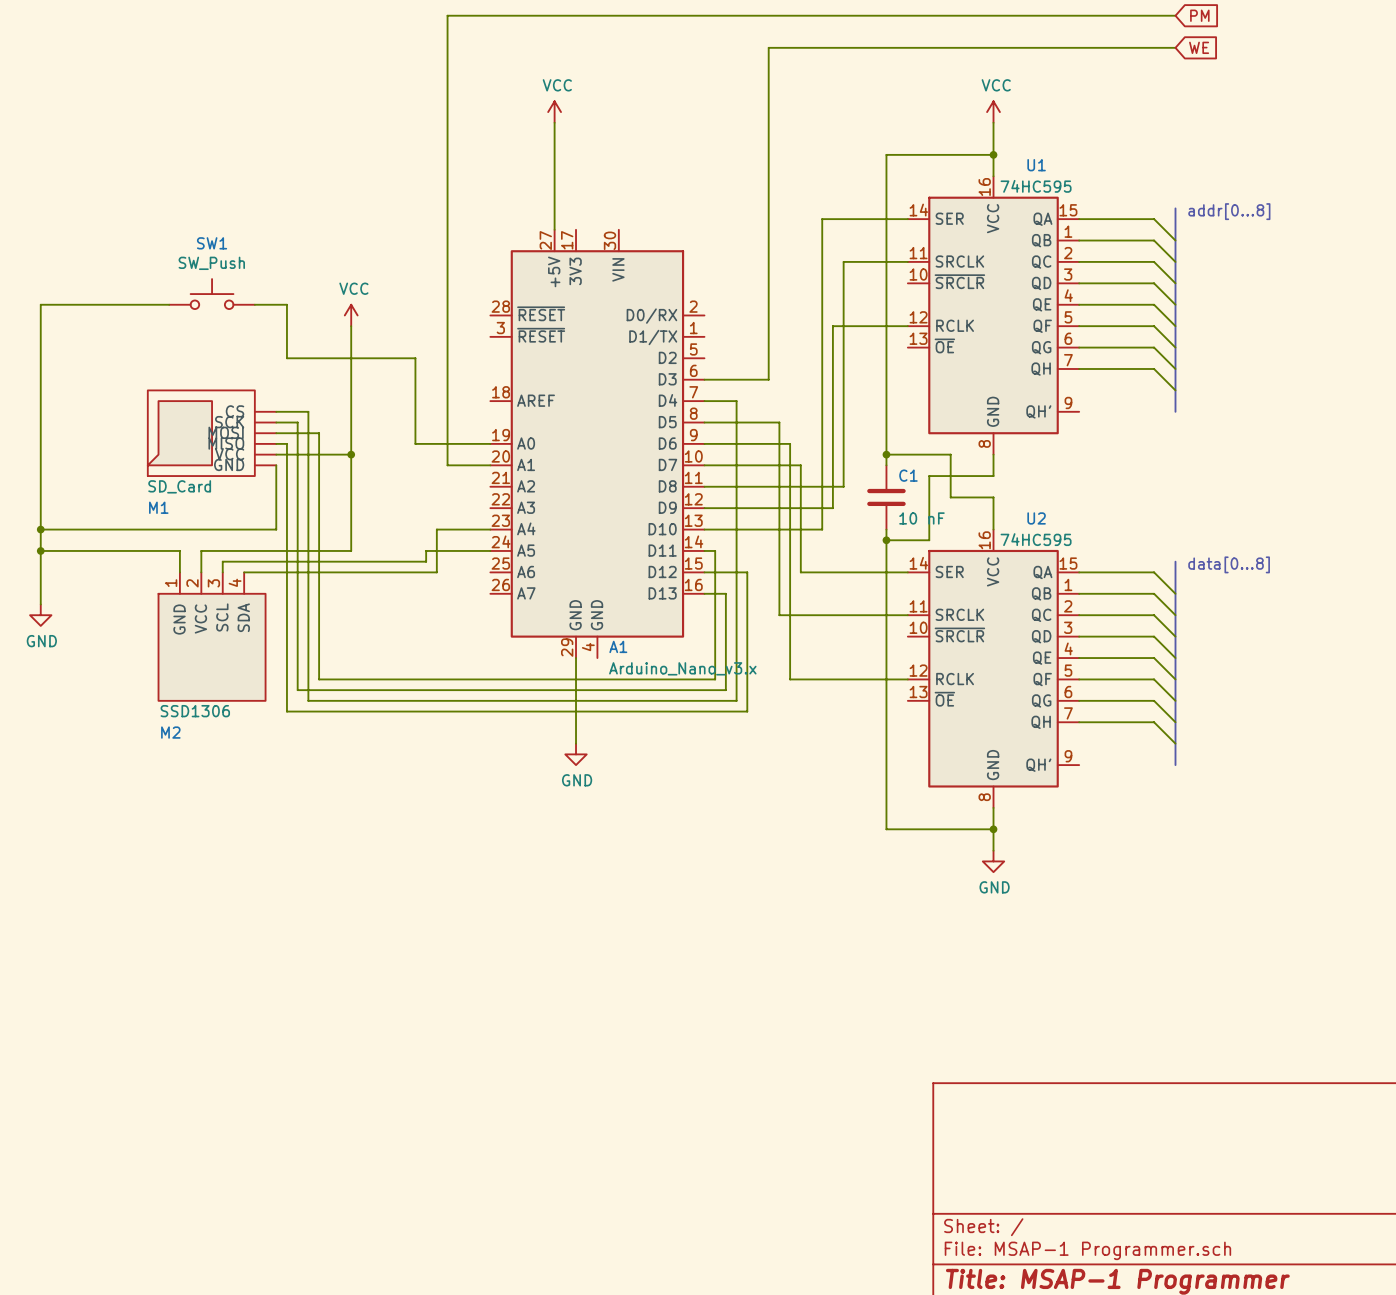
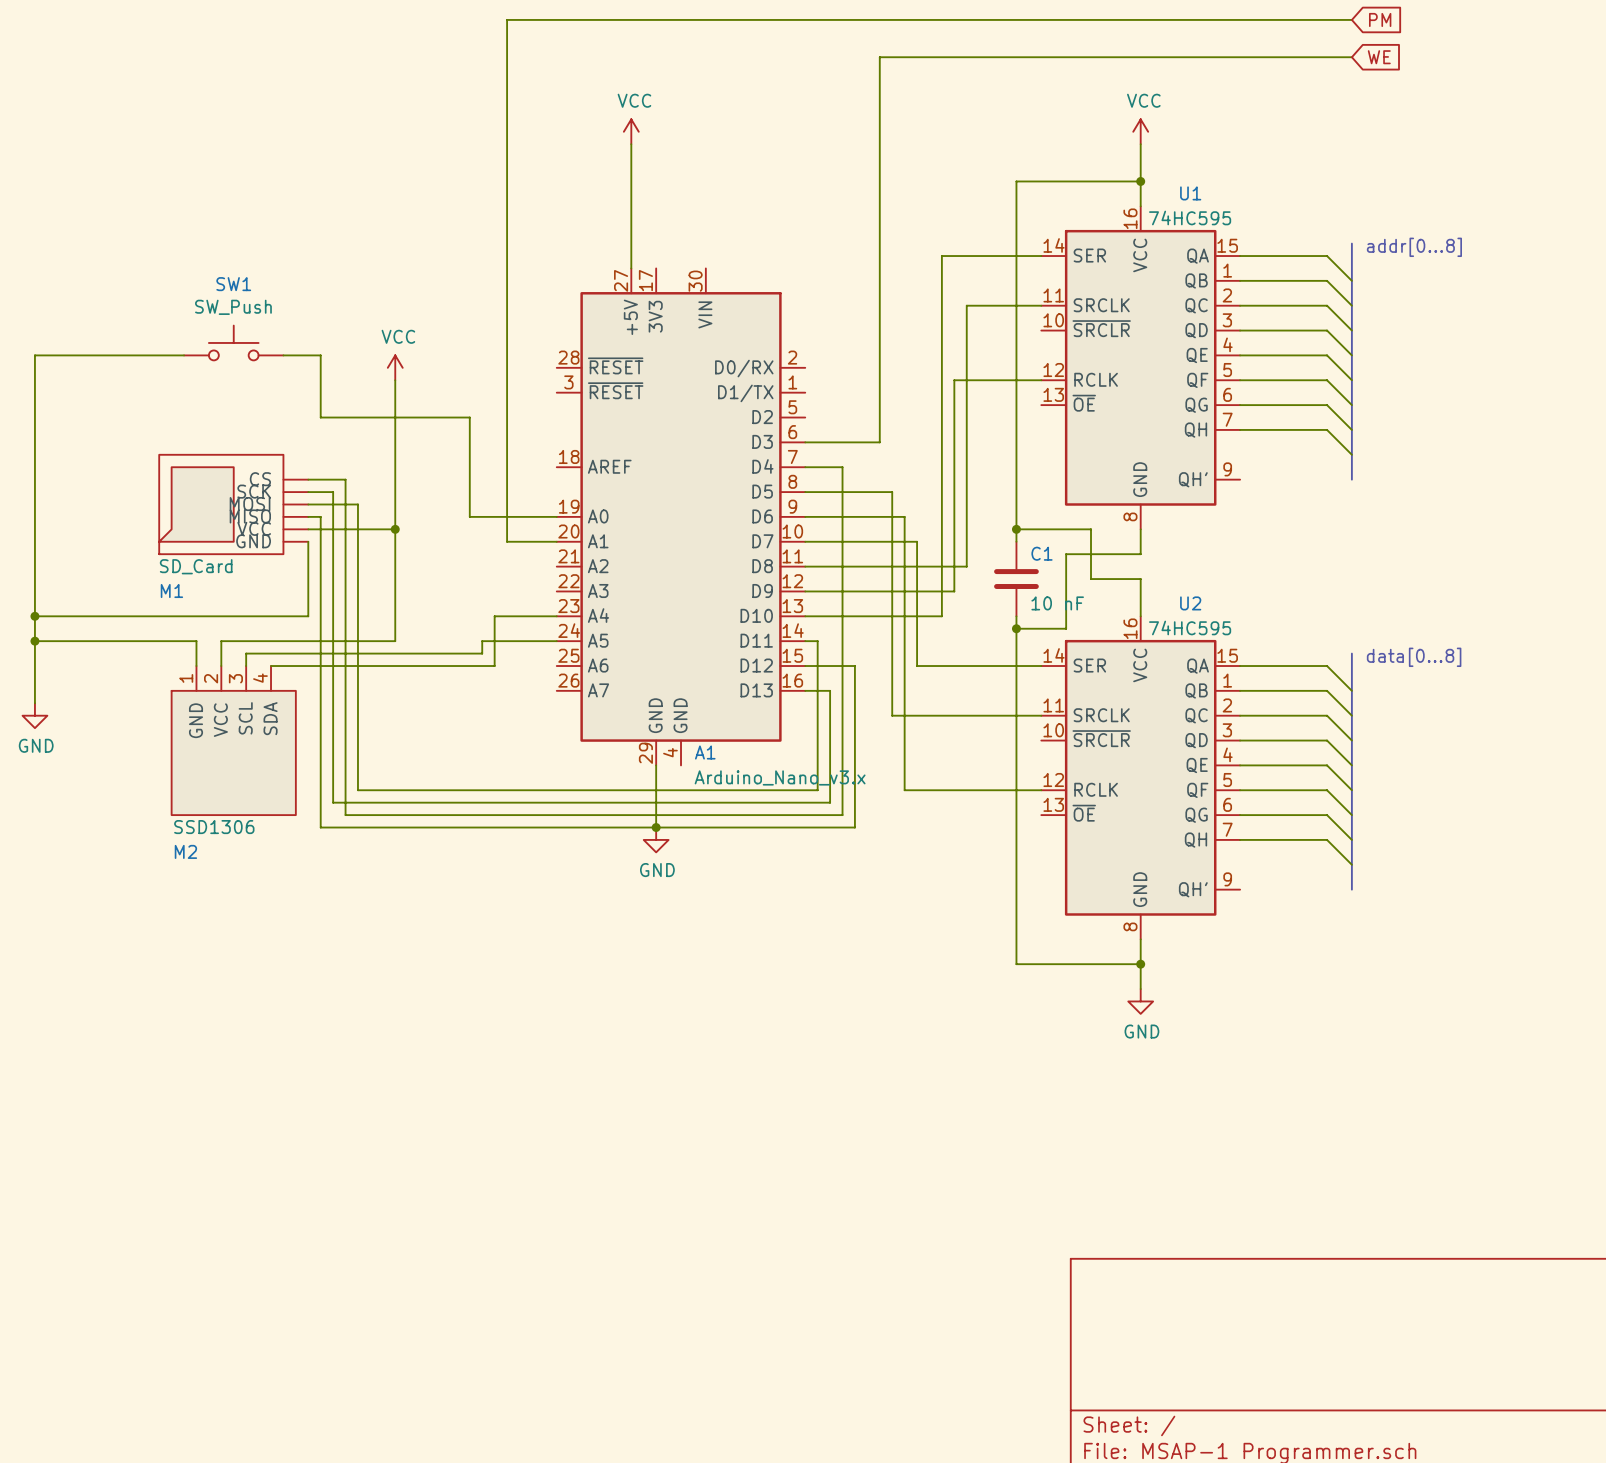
wire: (576, 711) (576, 743) -> none
junction: none -> (656, 827)
power symbol position: GND (576, 754) -> GND (656, 839)

